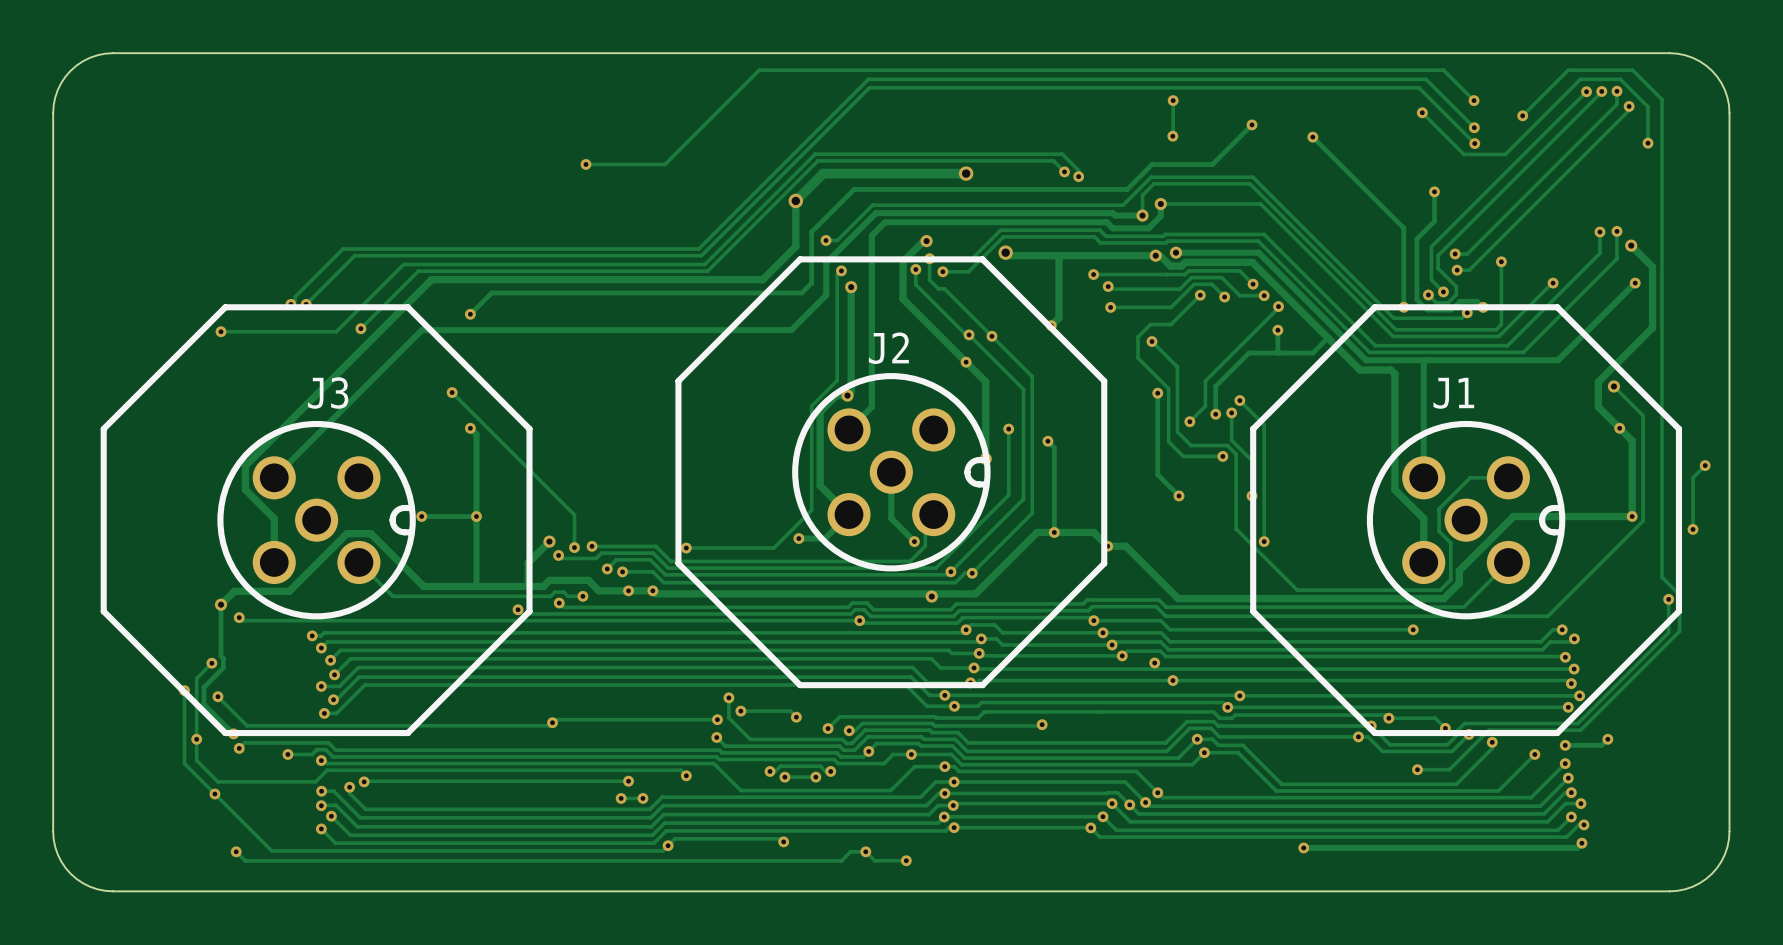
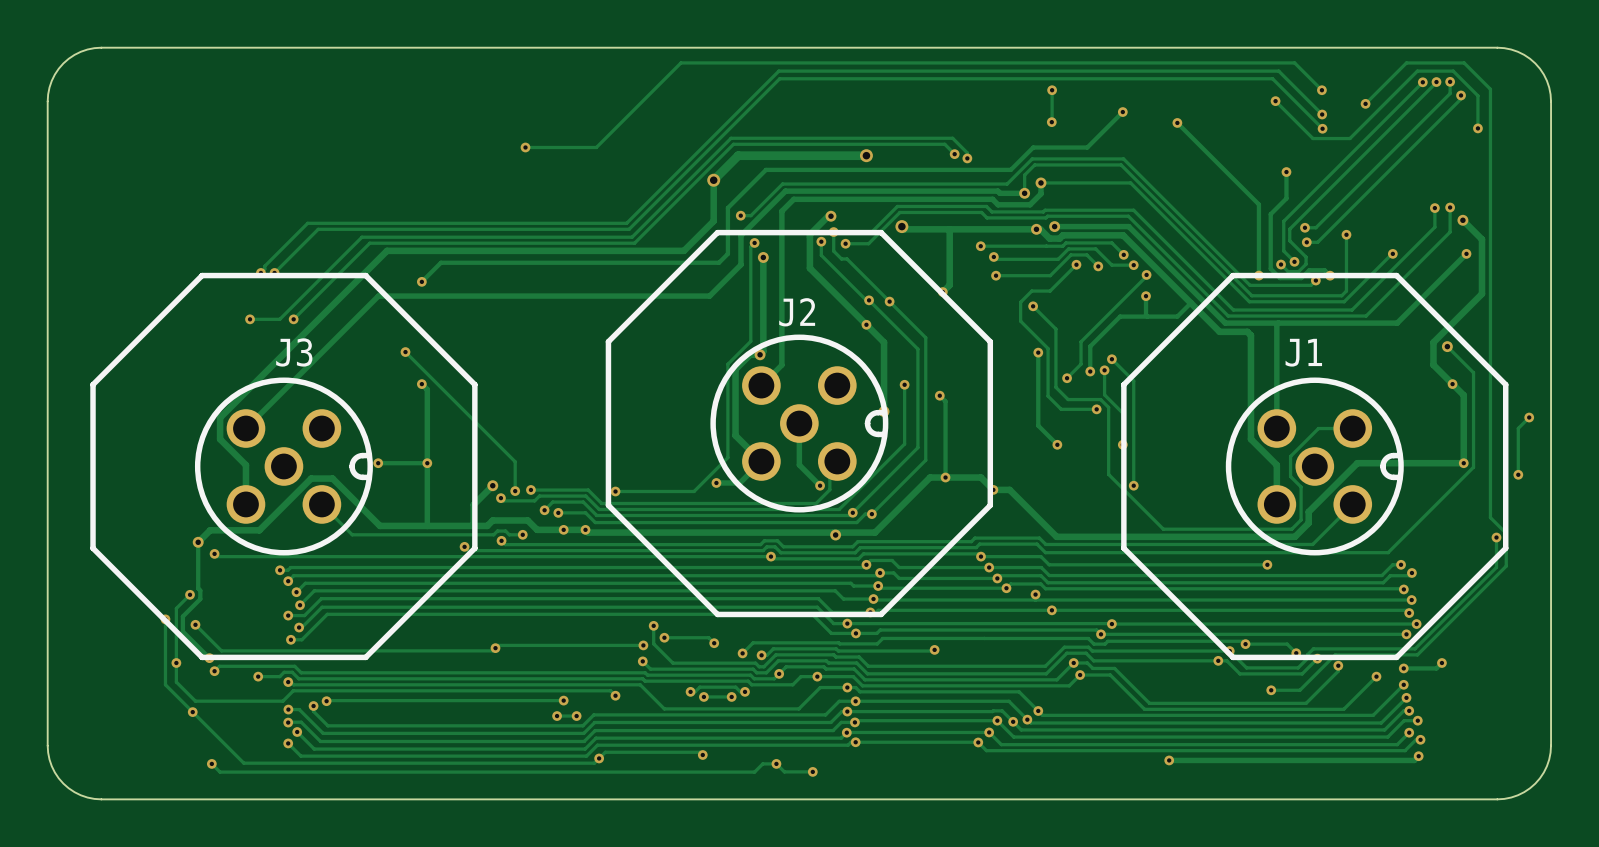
track: (418, 271) (360, 328) -> (375, 243) (369, 243) (293, 319)
via: (360, 328) -> none
via: (221, 331) -> none
track: (336, 331) (221, 331) -> (301, 297) (279, 319) (250, 319)
via: none -> (250, 319)
via: none -> (293, 319)

